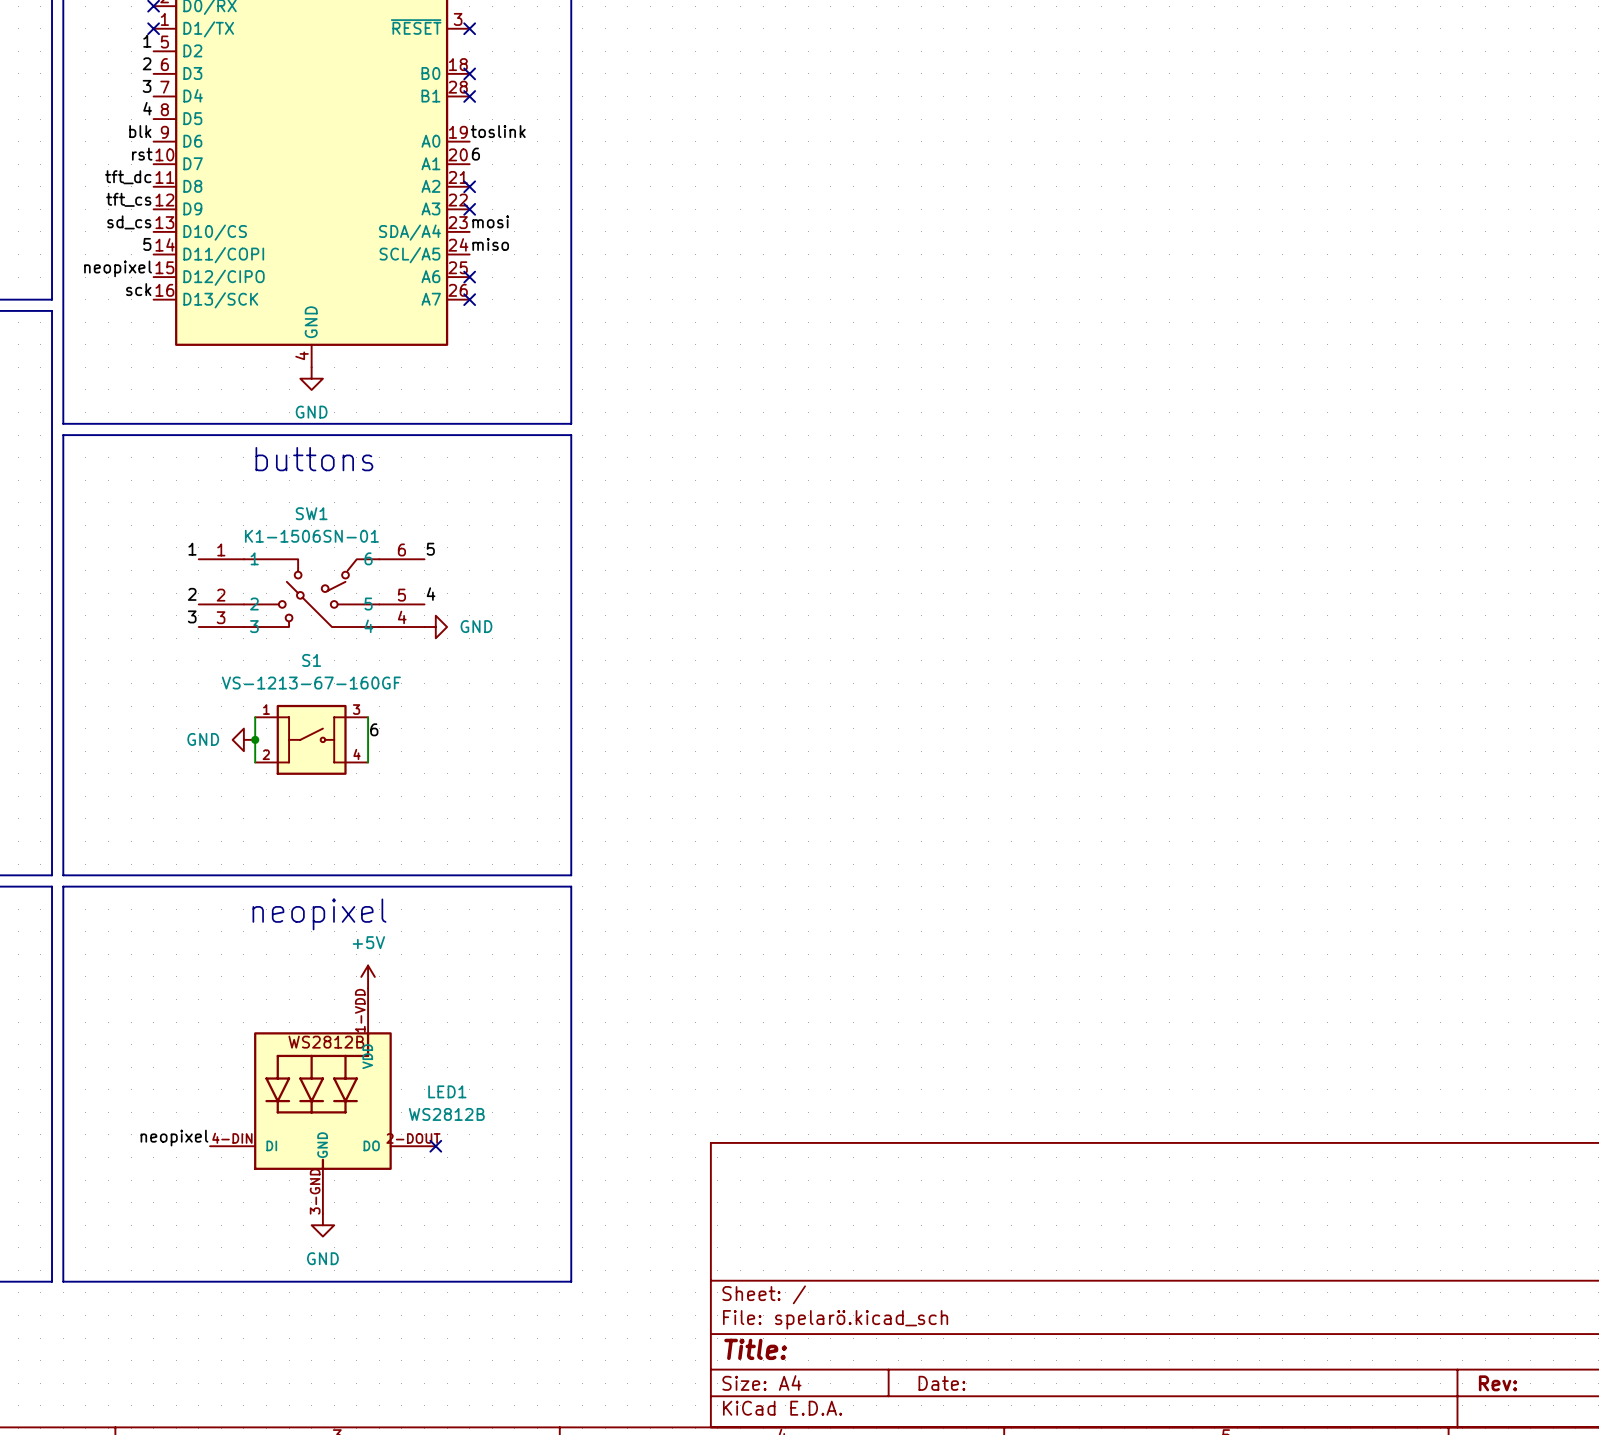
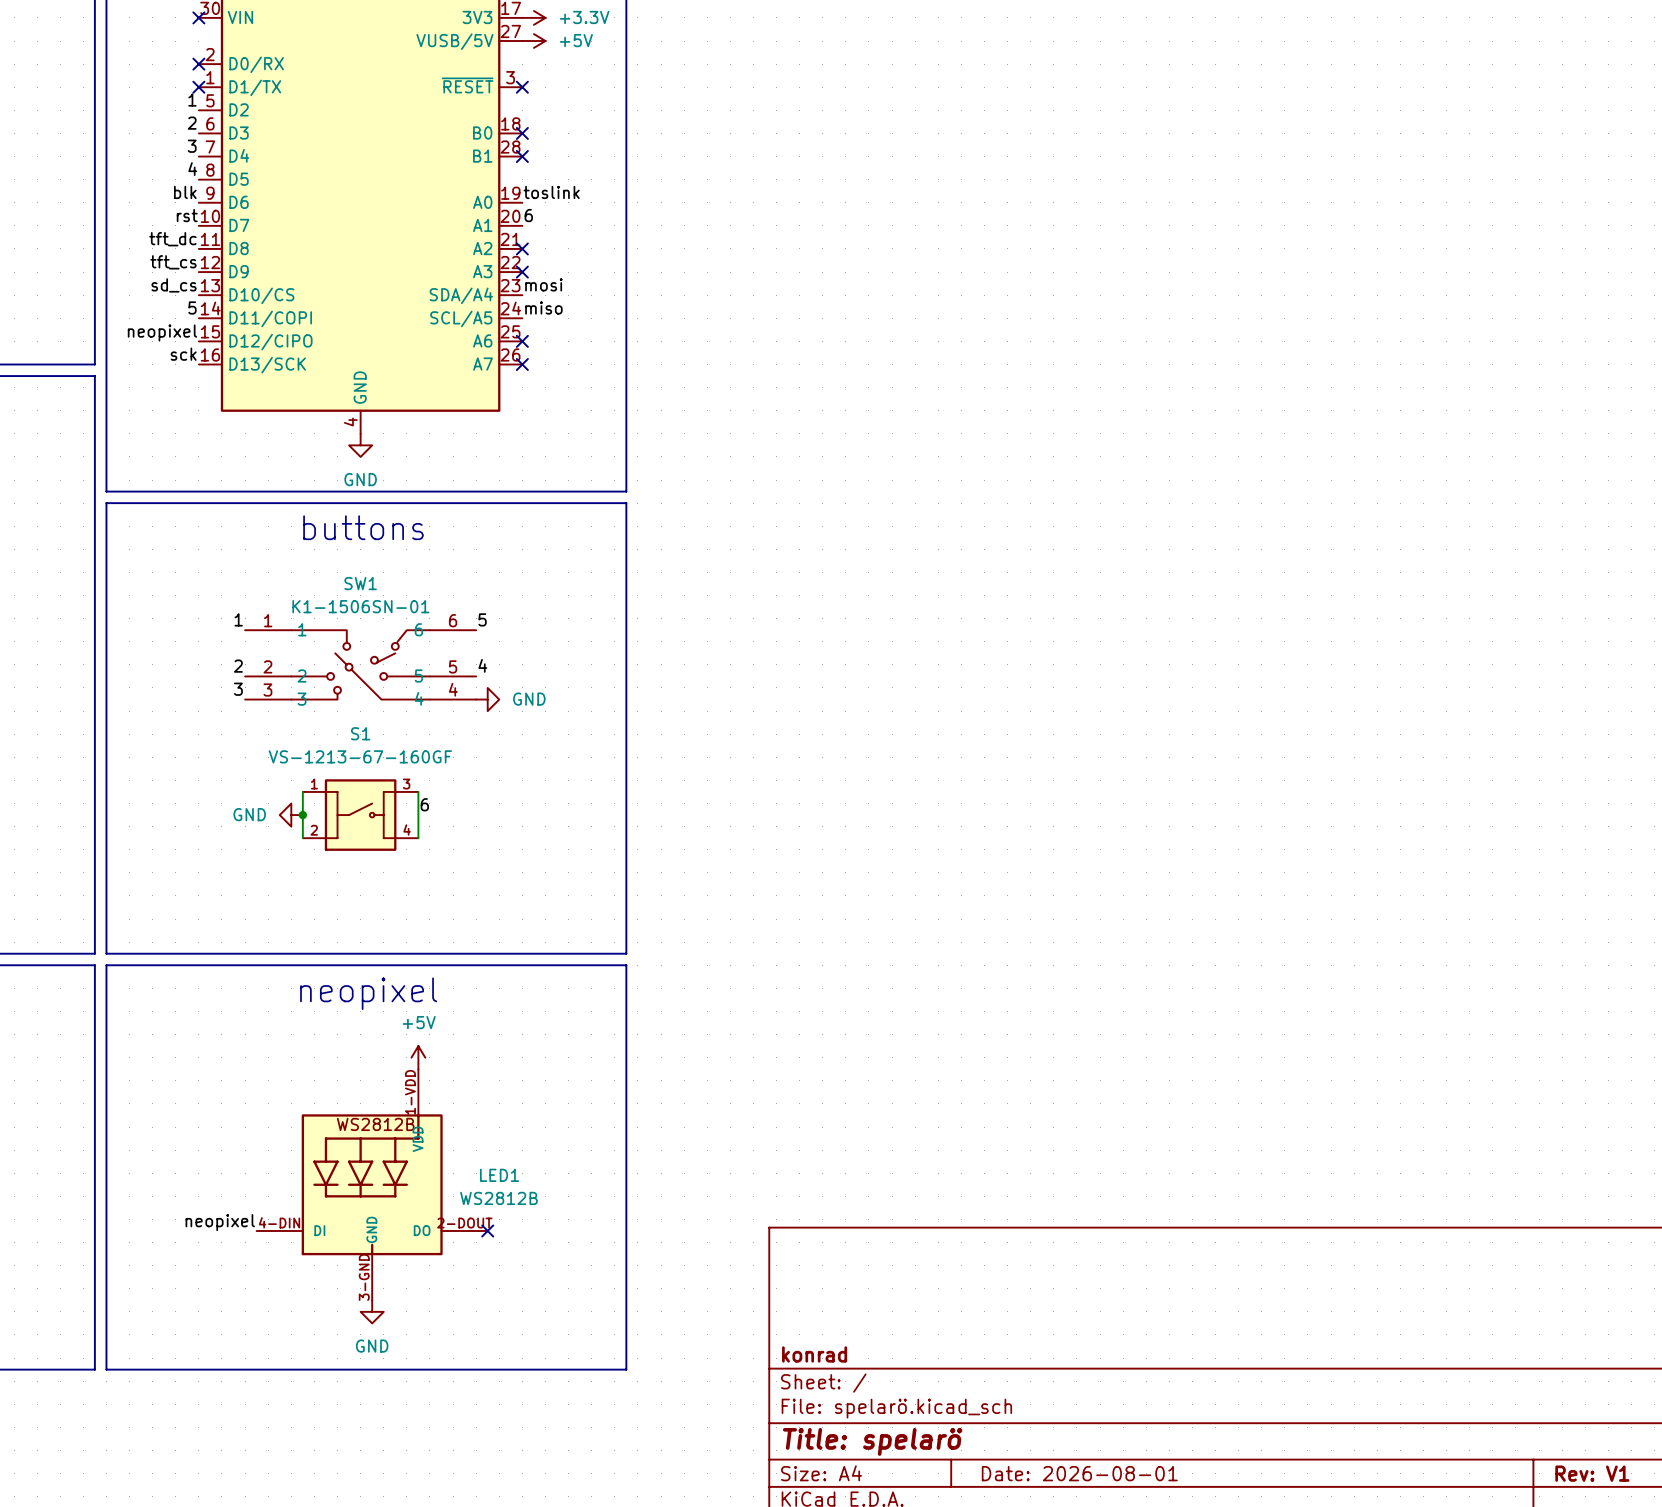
title block: none -> konrad (814, 1354)
title block: Title: (755, 1349) -> Title: spelarö (872, 1441)
title block: Date: (941, 1383) -> Date: 2026-08-01 (1079, 1473)
title block: Rev: (1497, 1383) -> Rev: V1 (1592, 1473)

